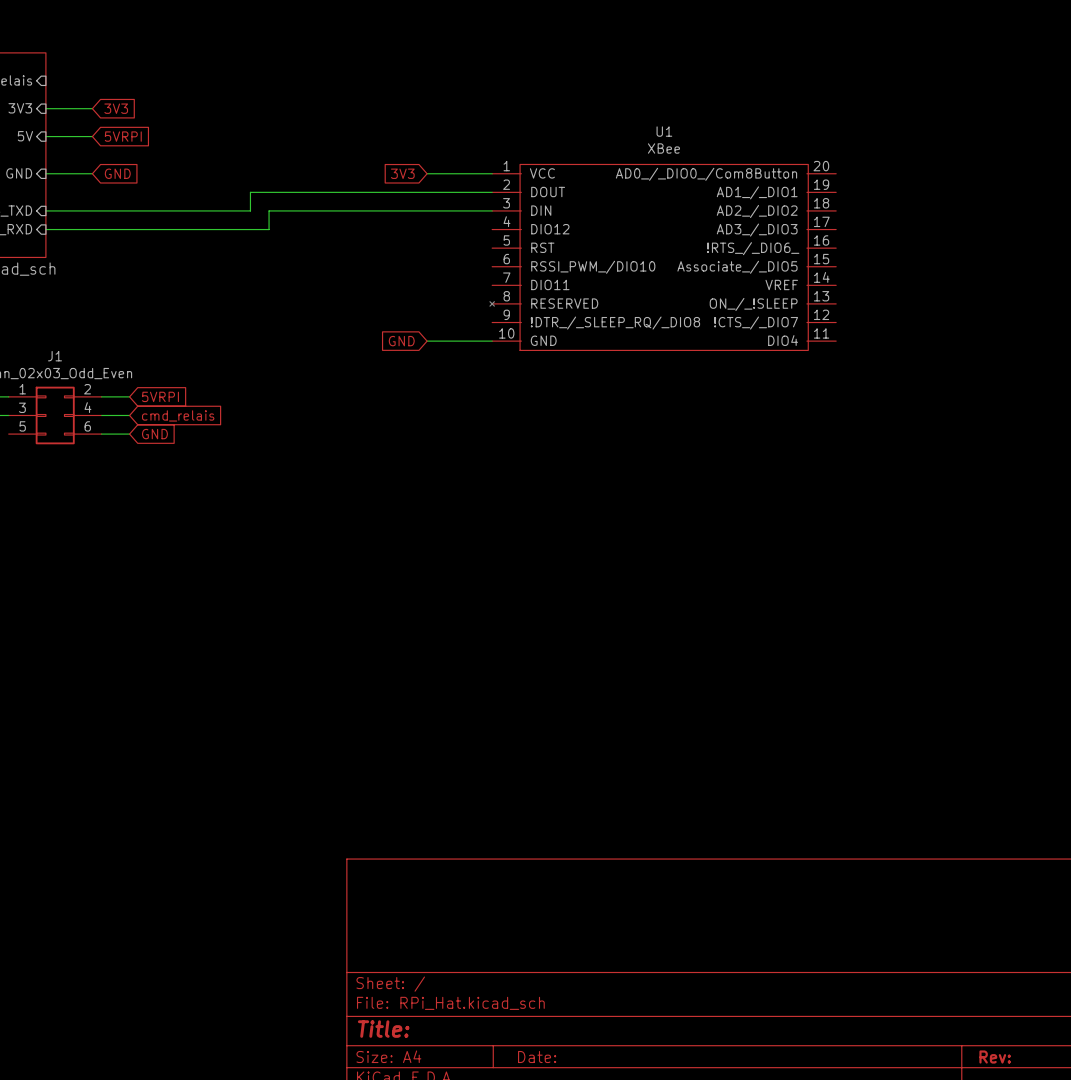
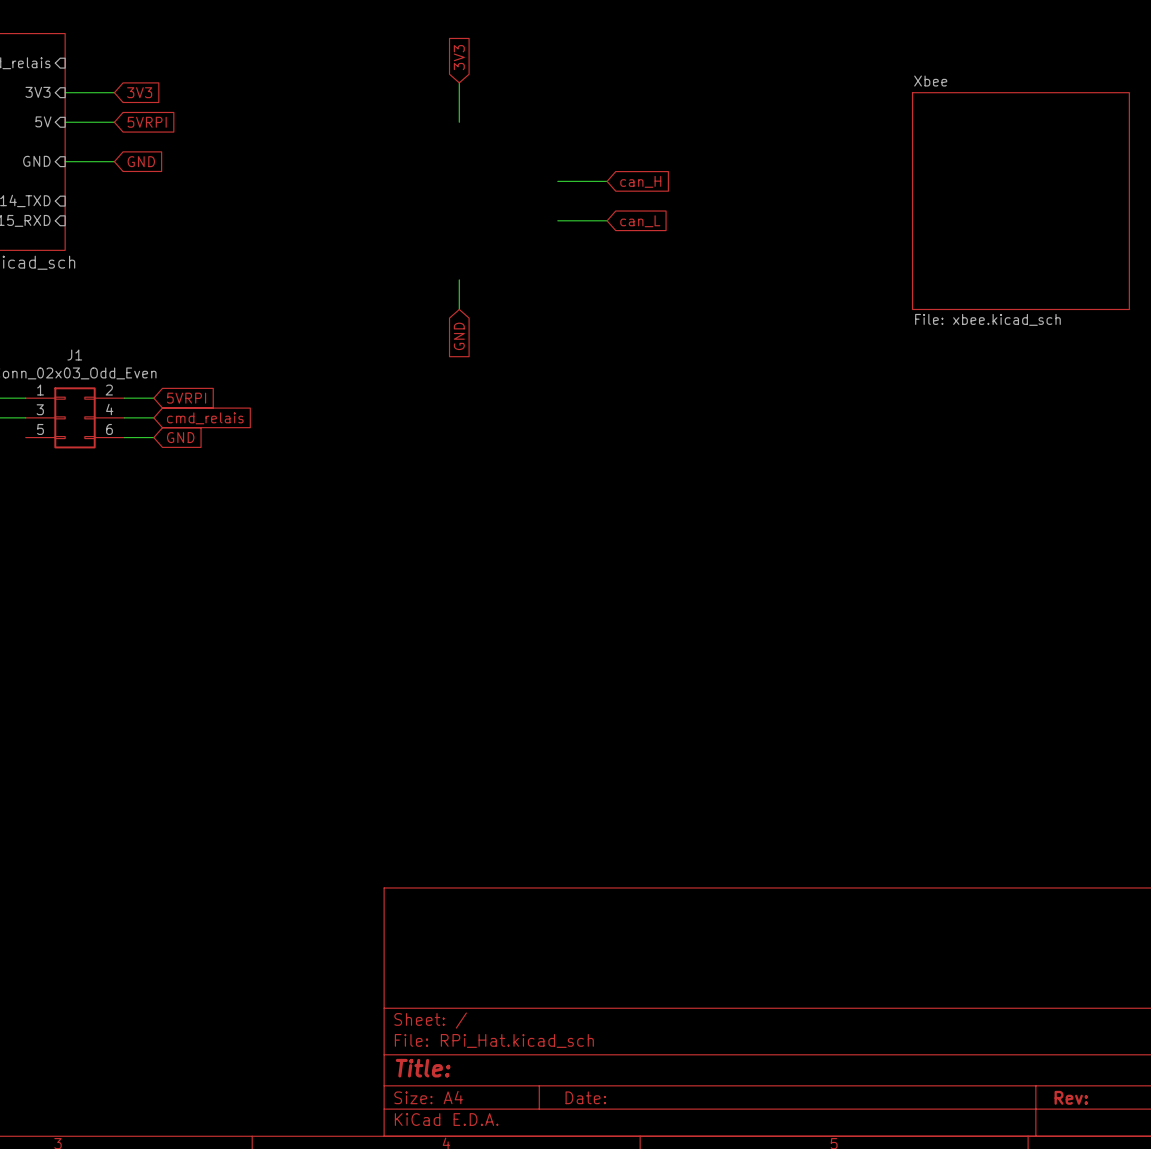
wire: none -> (459, 82) (459, 122)
global label rotation: 0° (402, 173) -> 90° clockwise (459, 57)
global label position: 3V3 (402, 173) -> 3V3 (459, 57)
wire: (427, 173) (492, 173) -> none
wire: (492, 192) (250, 192) (250, 210) (45, 210) -> none
wire: none -> (557, 181) (607, 181)
global label: none -> can_H (640, 181)
wire: (492, 210) (269, 210) (269, 229) (45, 229) -> none
sheet Xbee: none -> File: xbee.kicad_sch (1020, 201)
wire: none -> (557, 220) (607, 220)
global label: none -> can_L (640, 221)
U1: XBee (663, 257) -> none
wire: none -> (459, 279) (459, 309)
global label rotation: 0° (401, 341) -> 90° counterclockwise (459, 336)
wire: (427, 341) (492, 341) -> none

